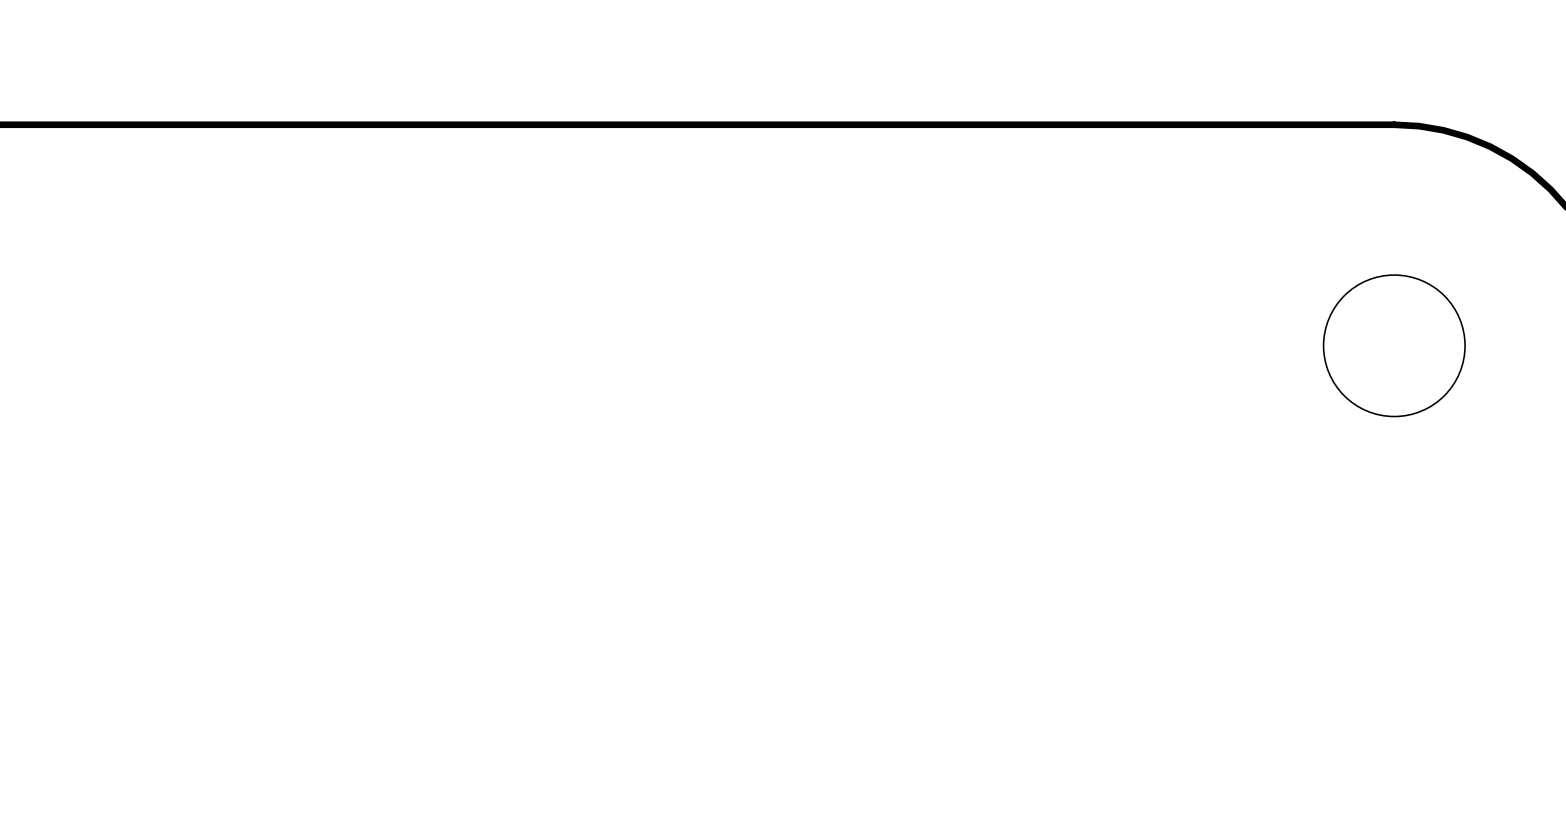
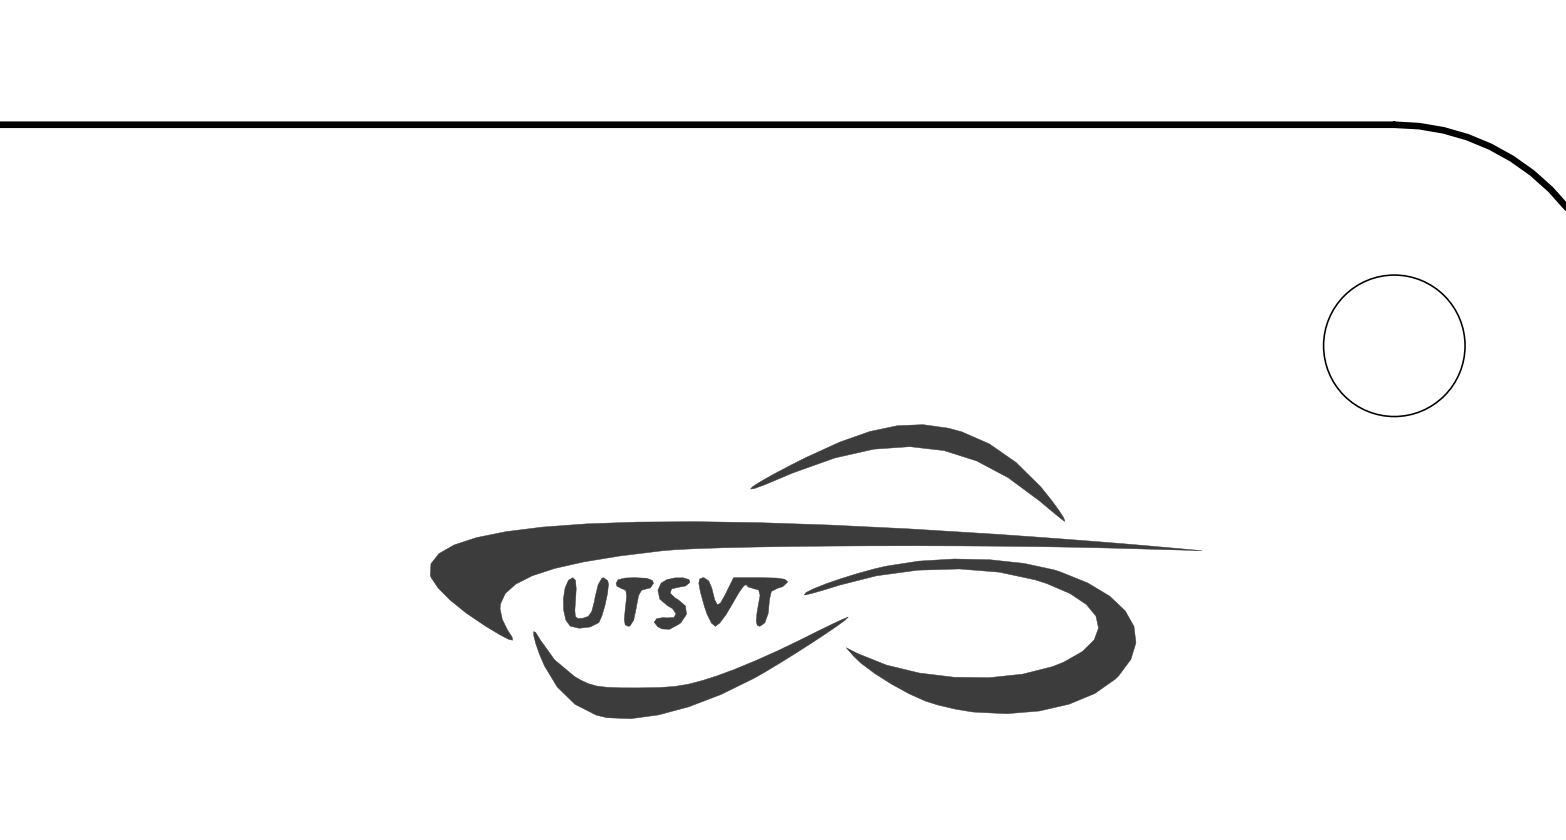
drawing: none -> [430, 424, 1203, 719]

